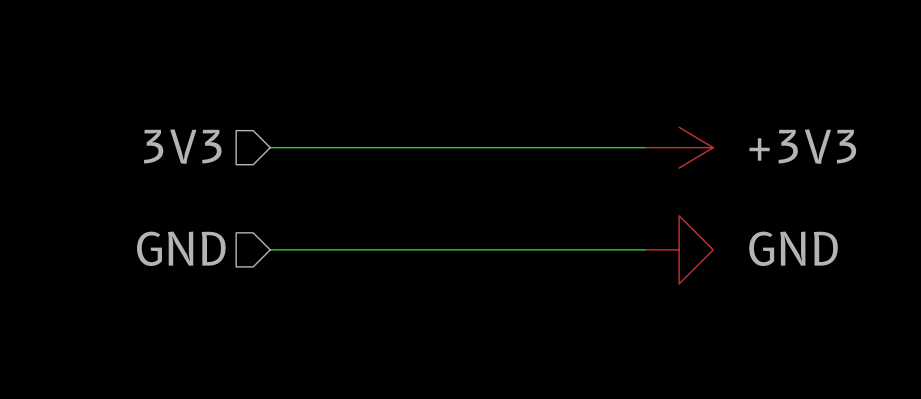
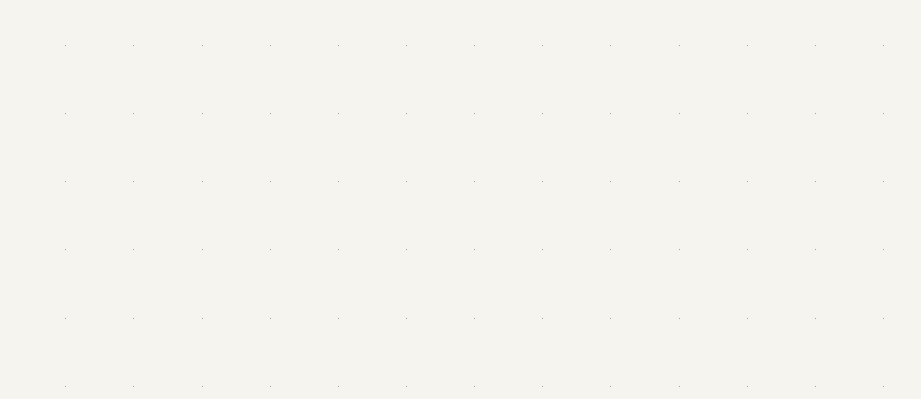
hierarchical label: 3V3 (182, 146) -> none
wire: (270, 147) (645, 147) -> none
power symbol: +3V3 (679, 147) -> none
hierarchical label: GND (181, 248) -> none
wire: (270, 249) (645, 249) -> none
power symbol: GND (679, 249) -> none

